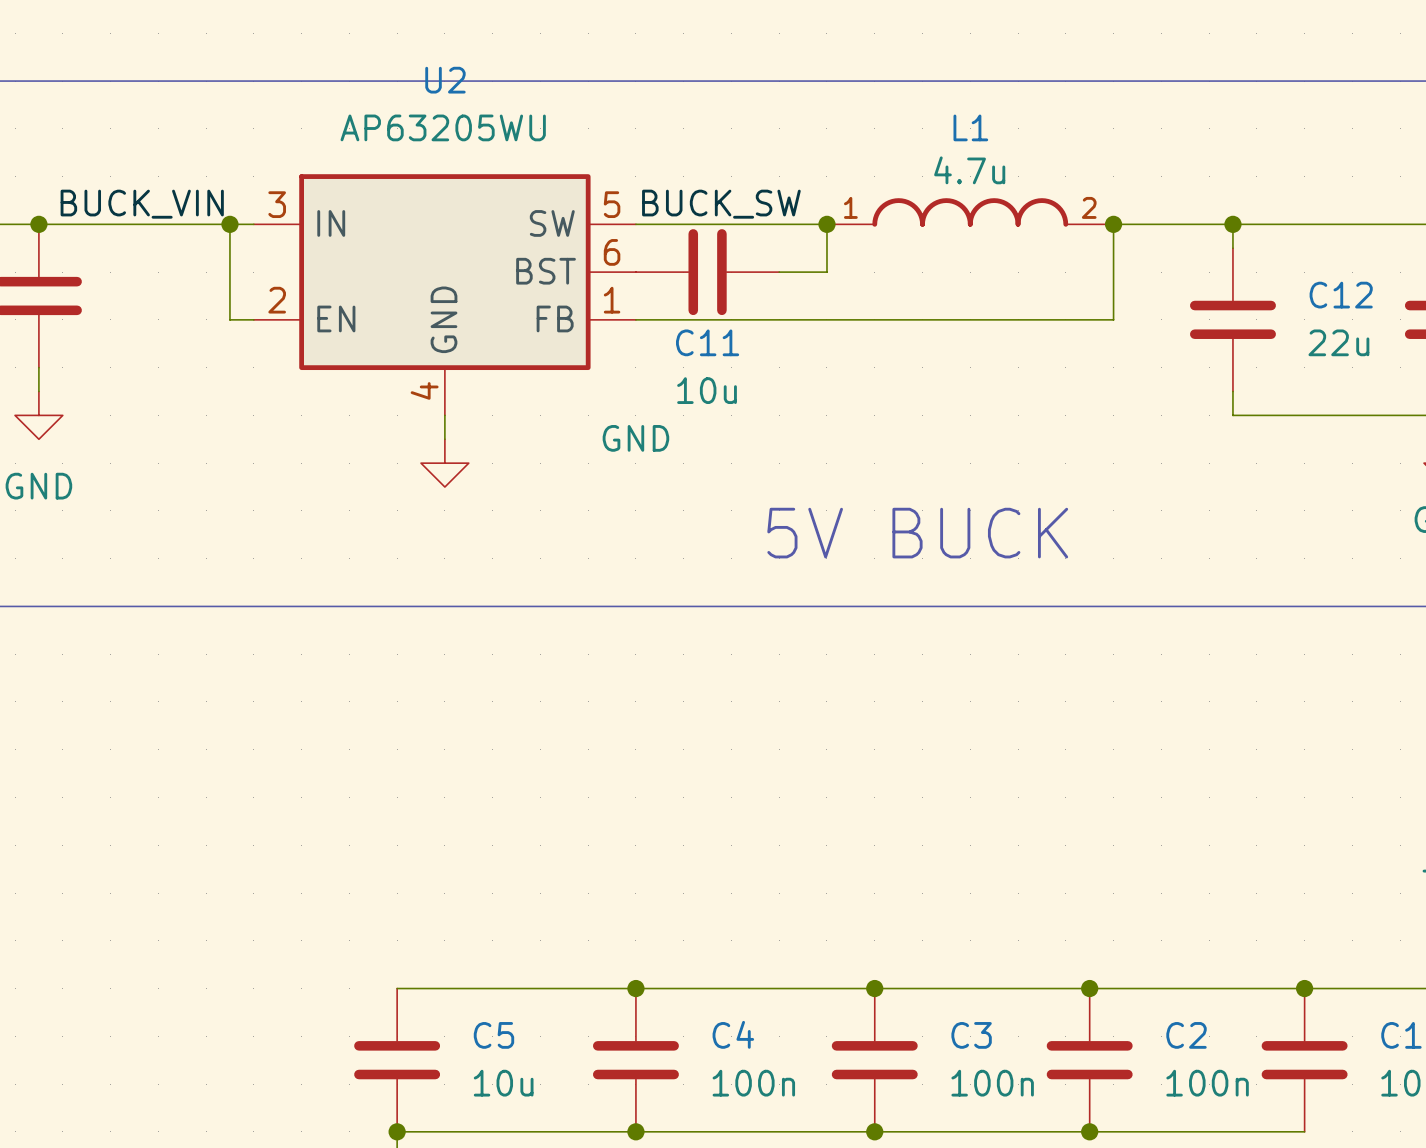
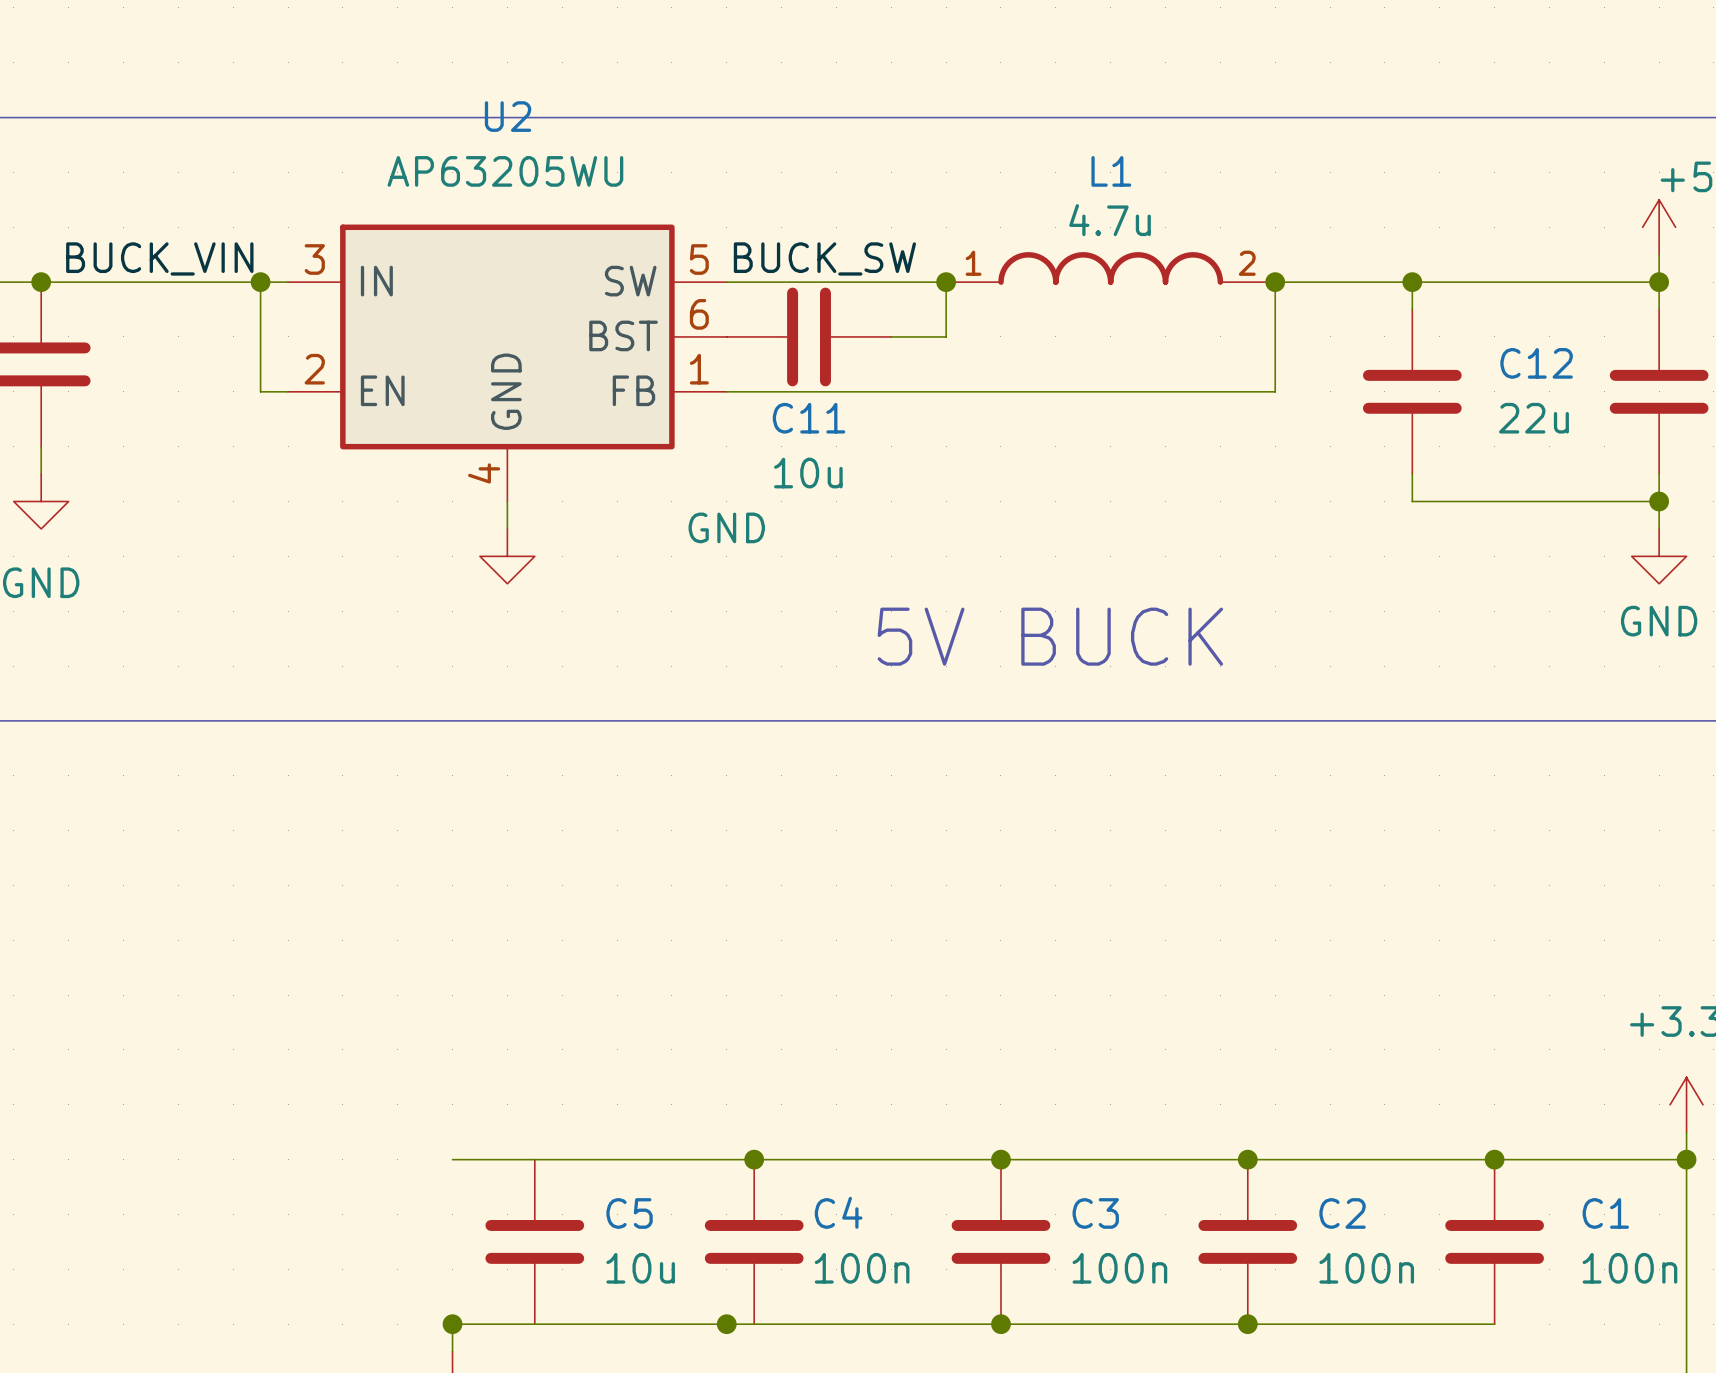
junction position: (635, 988) -> (754, 1159)
C5 name position: C5 (493, 1035) -> C5 (629, 1213)
C3 name position: C3 (971, 1035) -> C3 (1095, 1213)
C2 name position: C2 (1186, 1035) -> C2 (1342, 1213)
C5 position: (397, 1060) -> (534, 1241)
C4 position: (635, 1060) -> (754, 1241)
C5 value position: 10u (503, 1083) -> 10u (640, 1268)
C3 value position: 100n (992, 1083) -> 100n (1119, 1268)
C2 value position: 100n (1207, 1083) -> 100n (1366, 1268)

